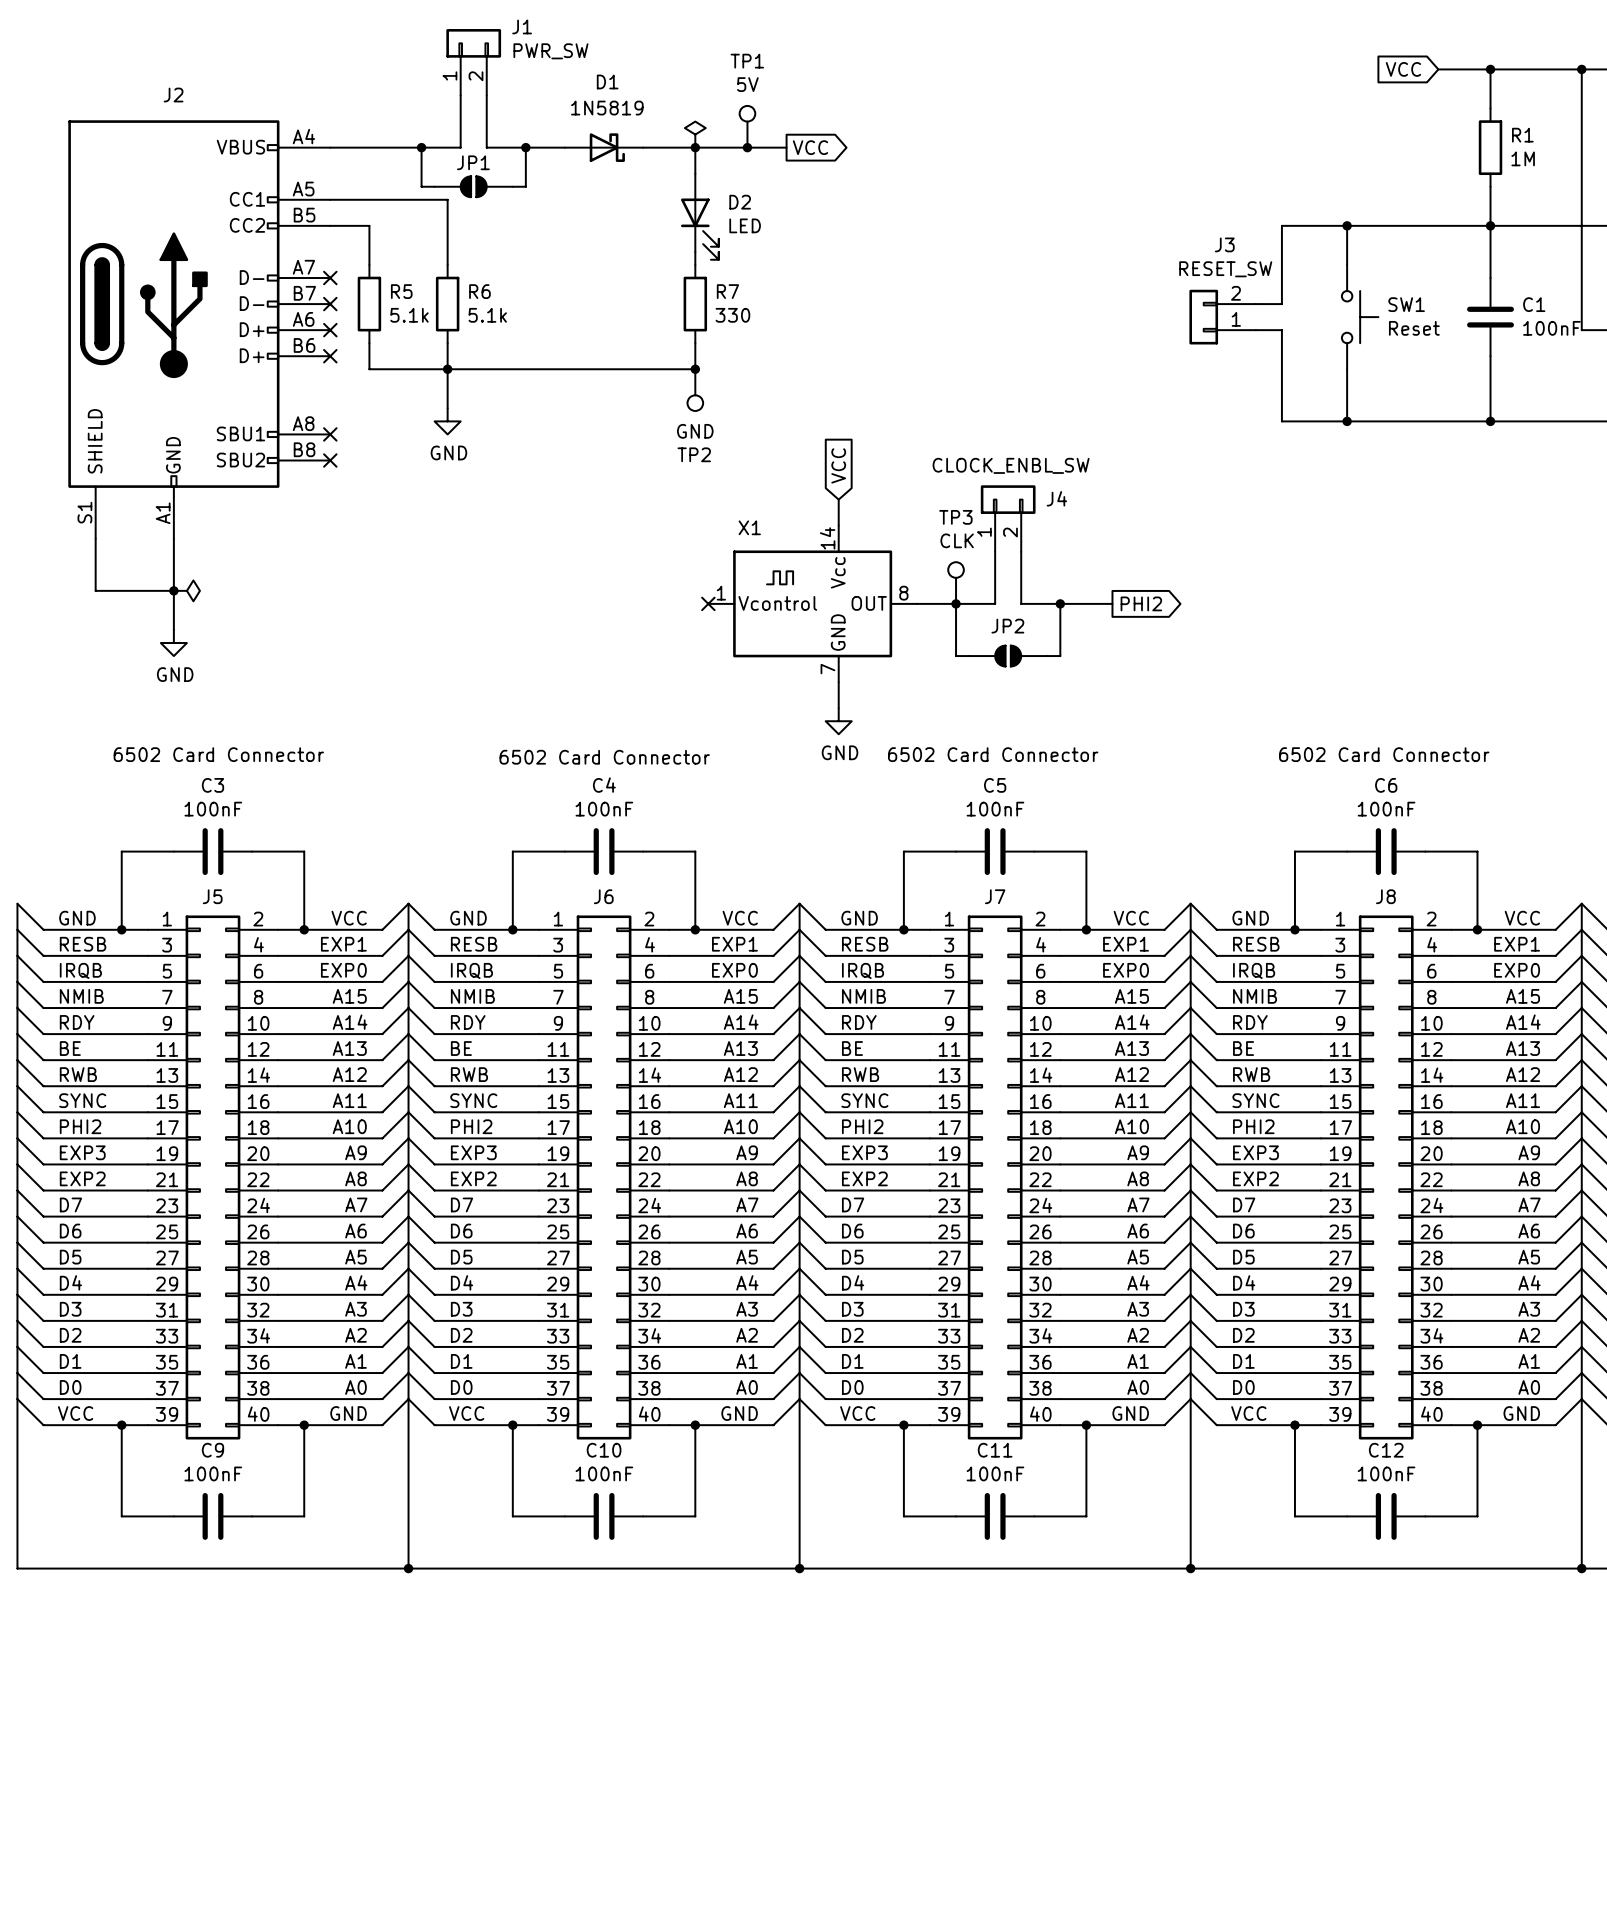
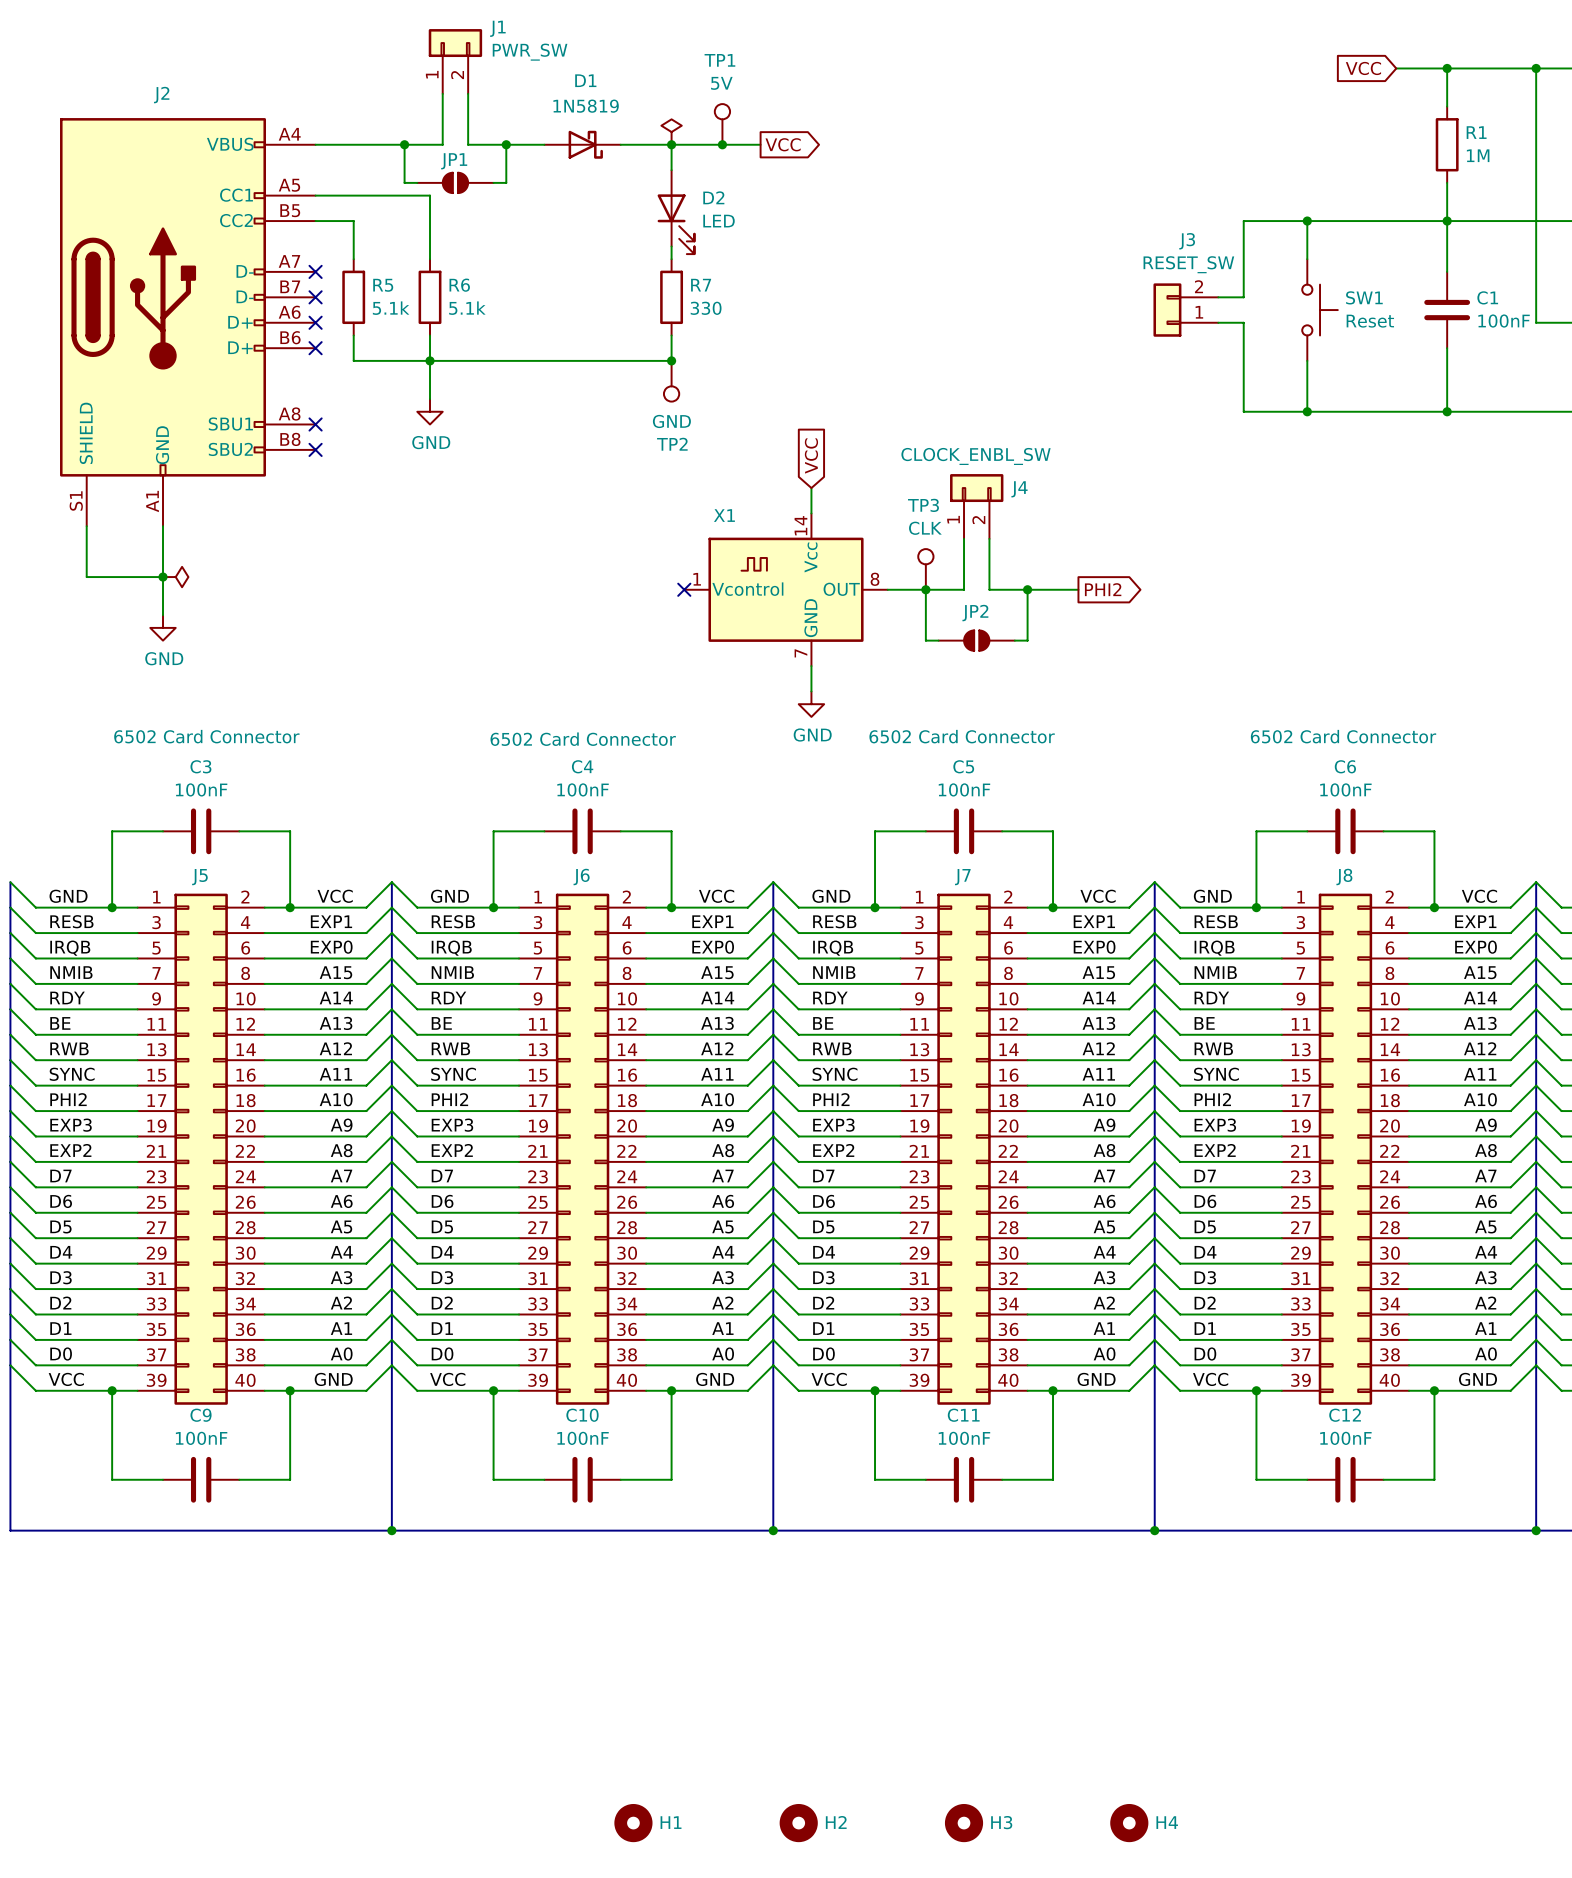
H1: none -> (633, 1823)
H2: none -> (798, 1823)
H3: none -> (964, 1823)
H4: none -> (1129, 1823)

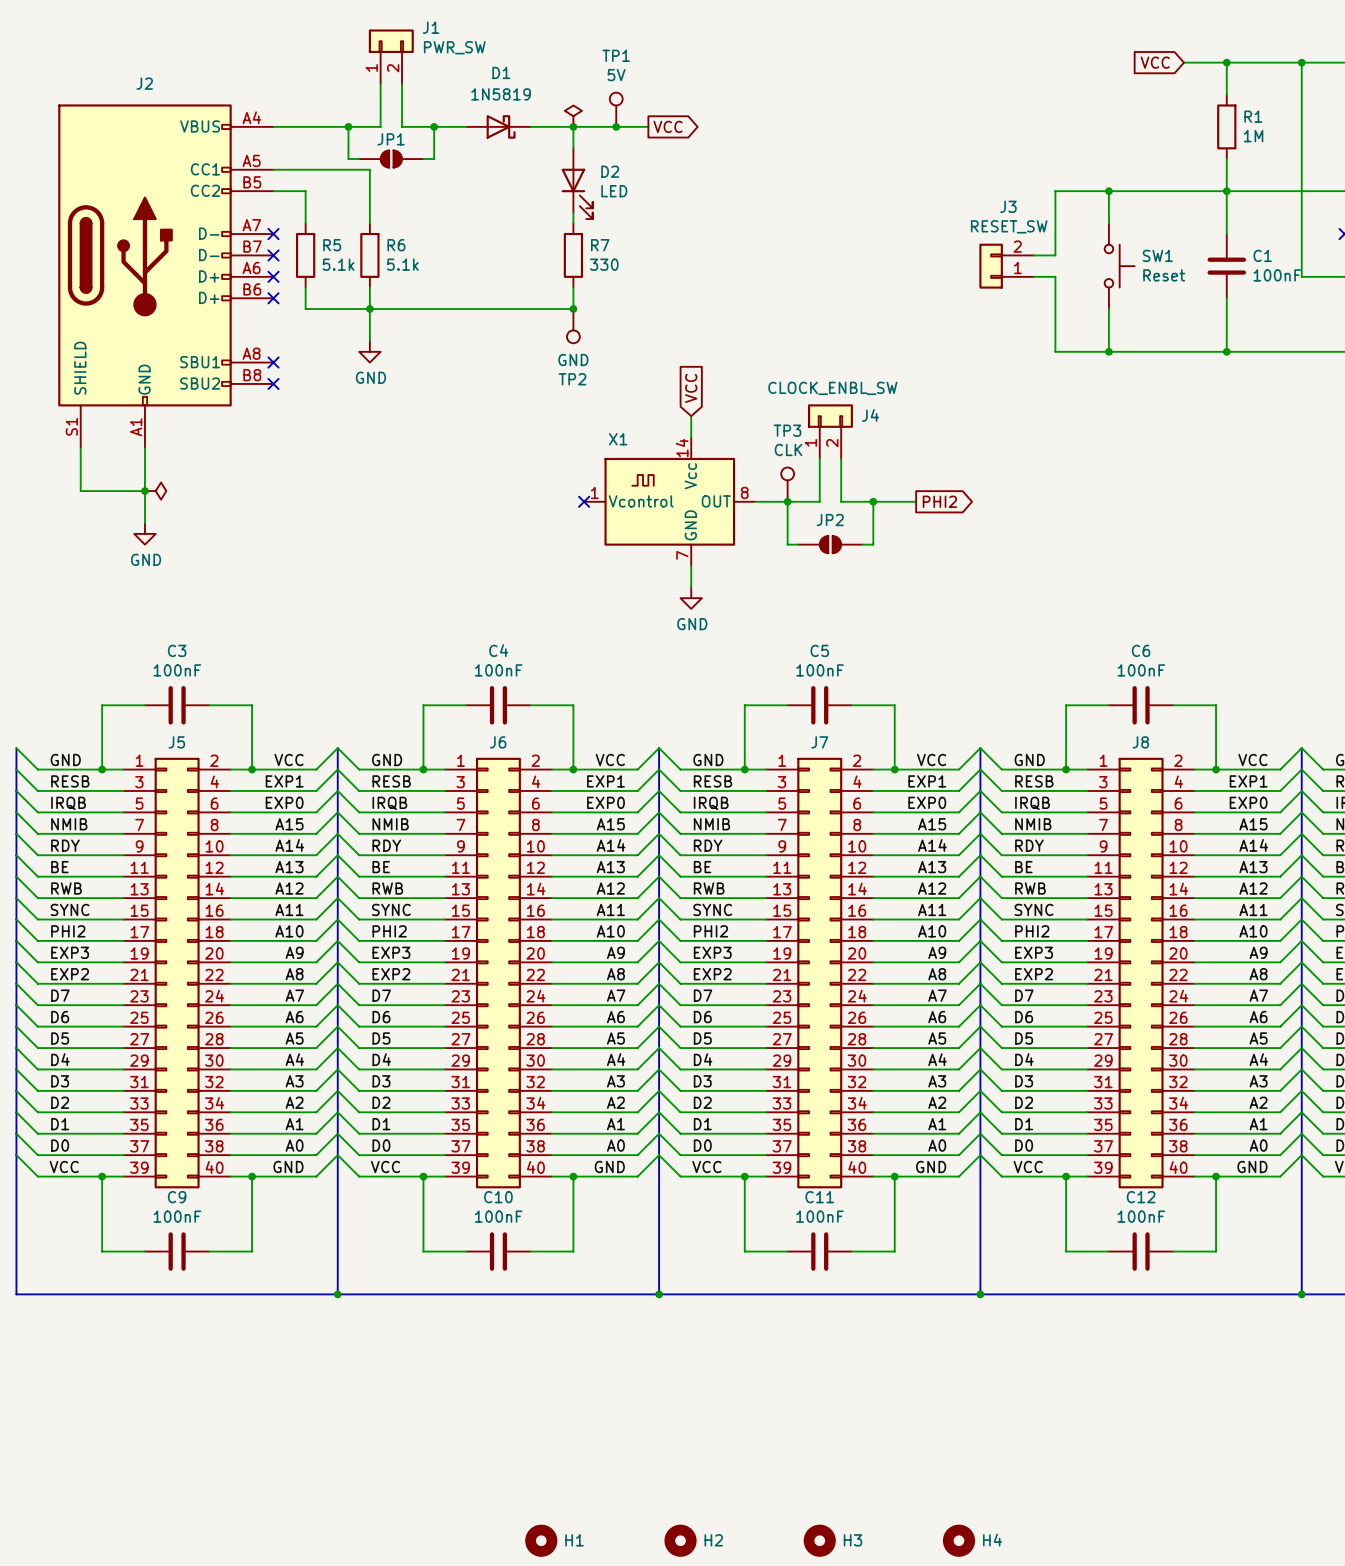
J5 value: 6502 Card Connector (206, 736) -> none
J7 value: 6502 Card Connector (962, 736) -> none
J8 value: 6502 Card Connector (1343, 736) -> none
J6 value: 6502 Card Connector (583, 739) -> none

